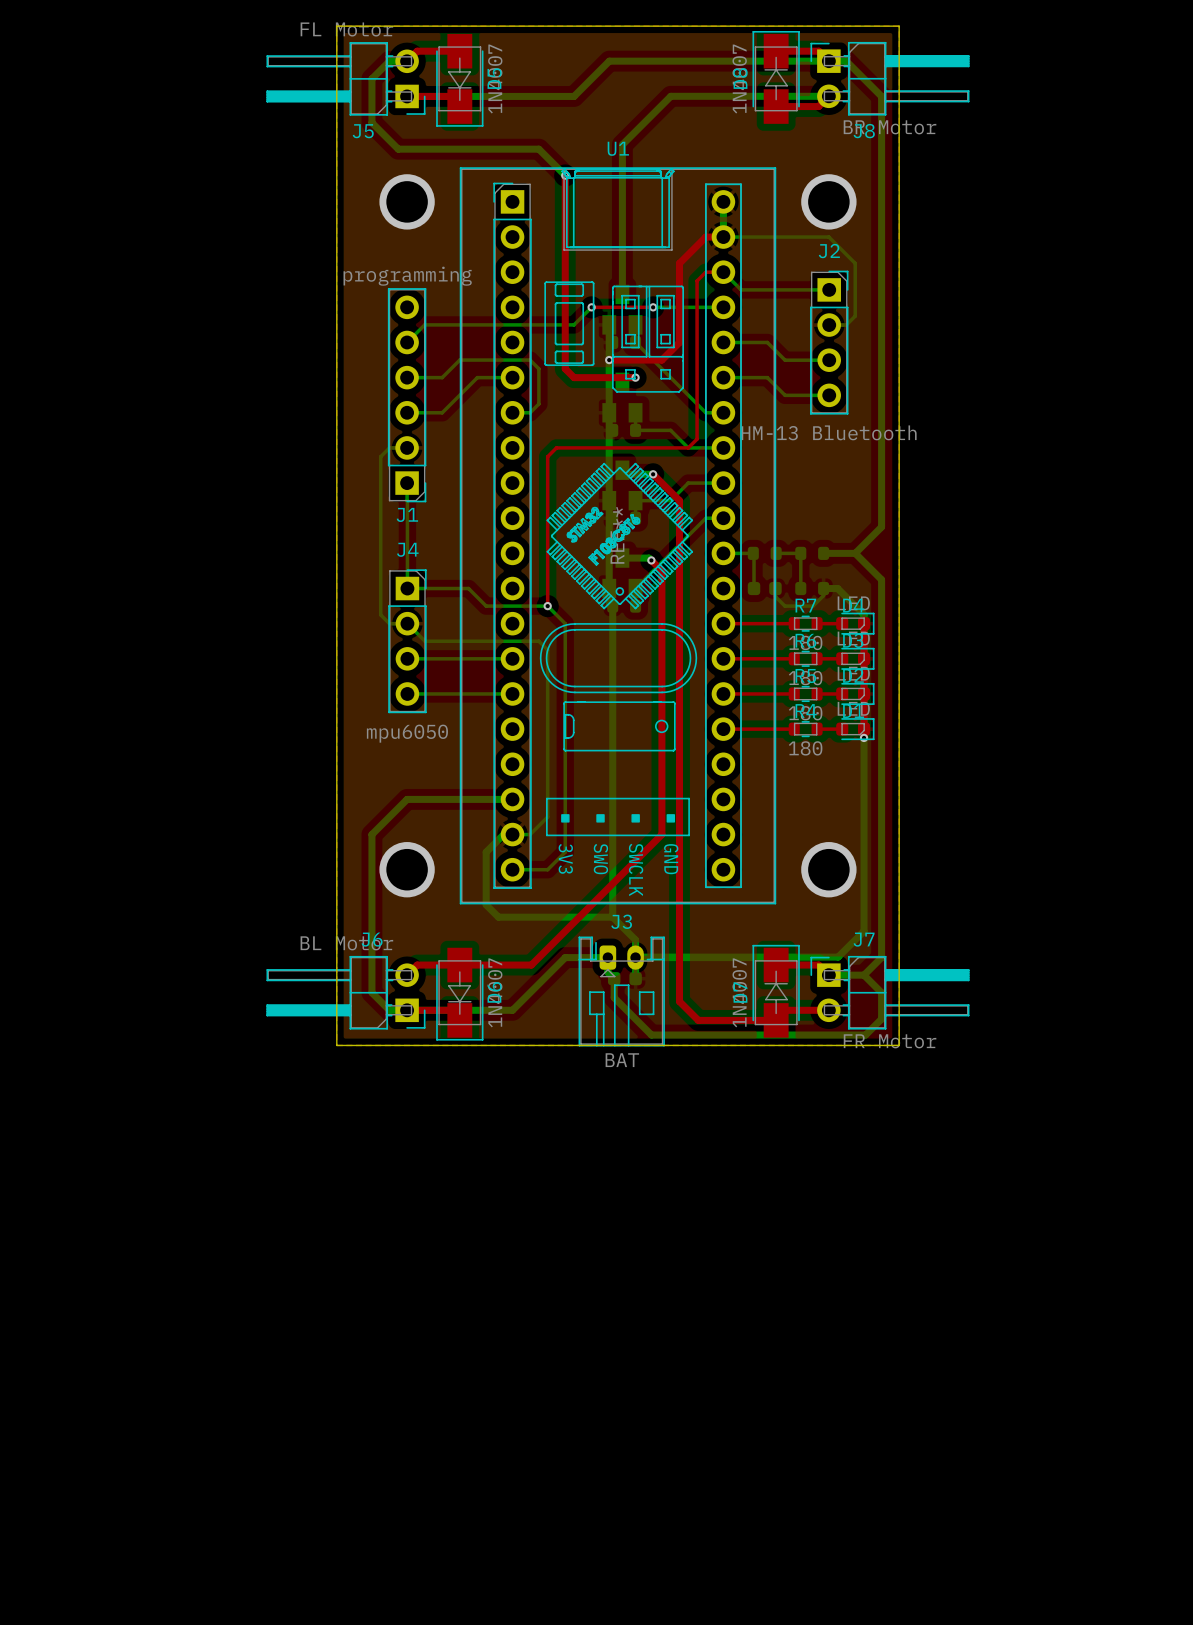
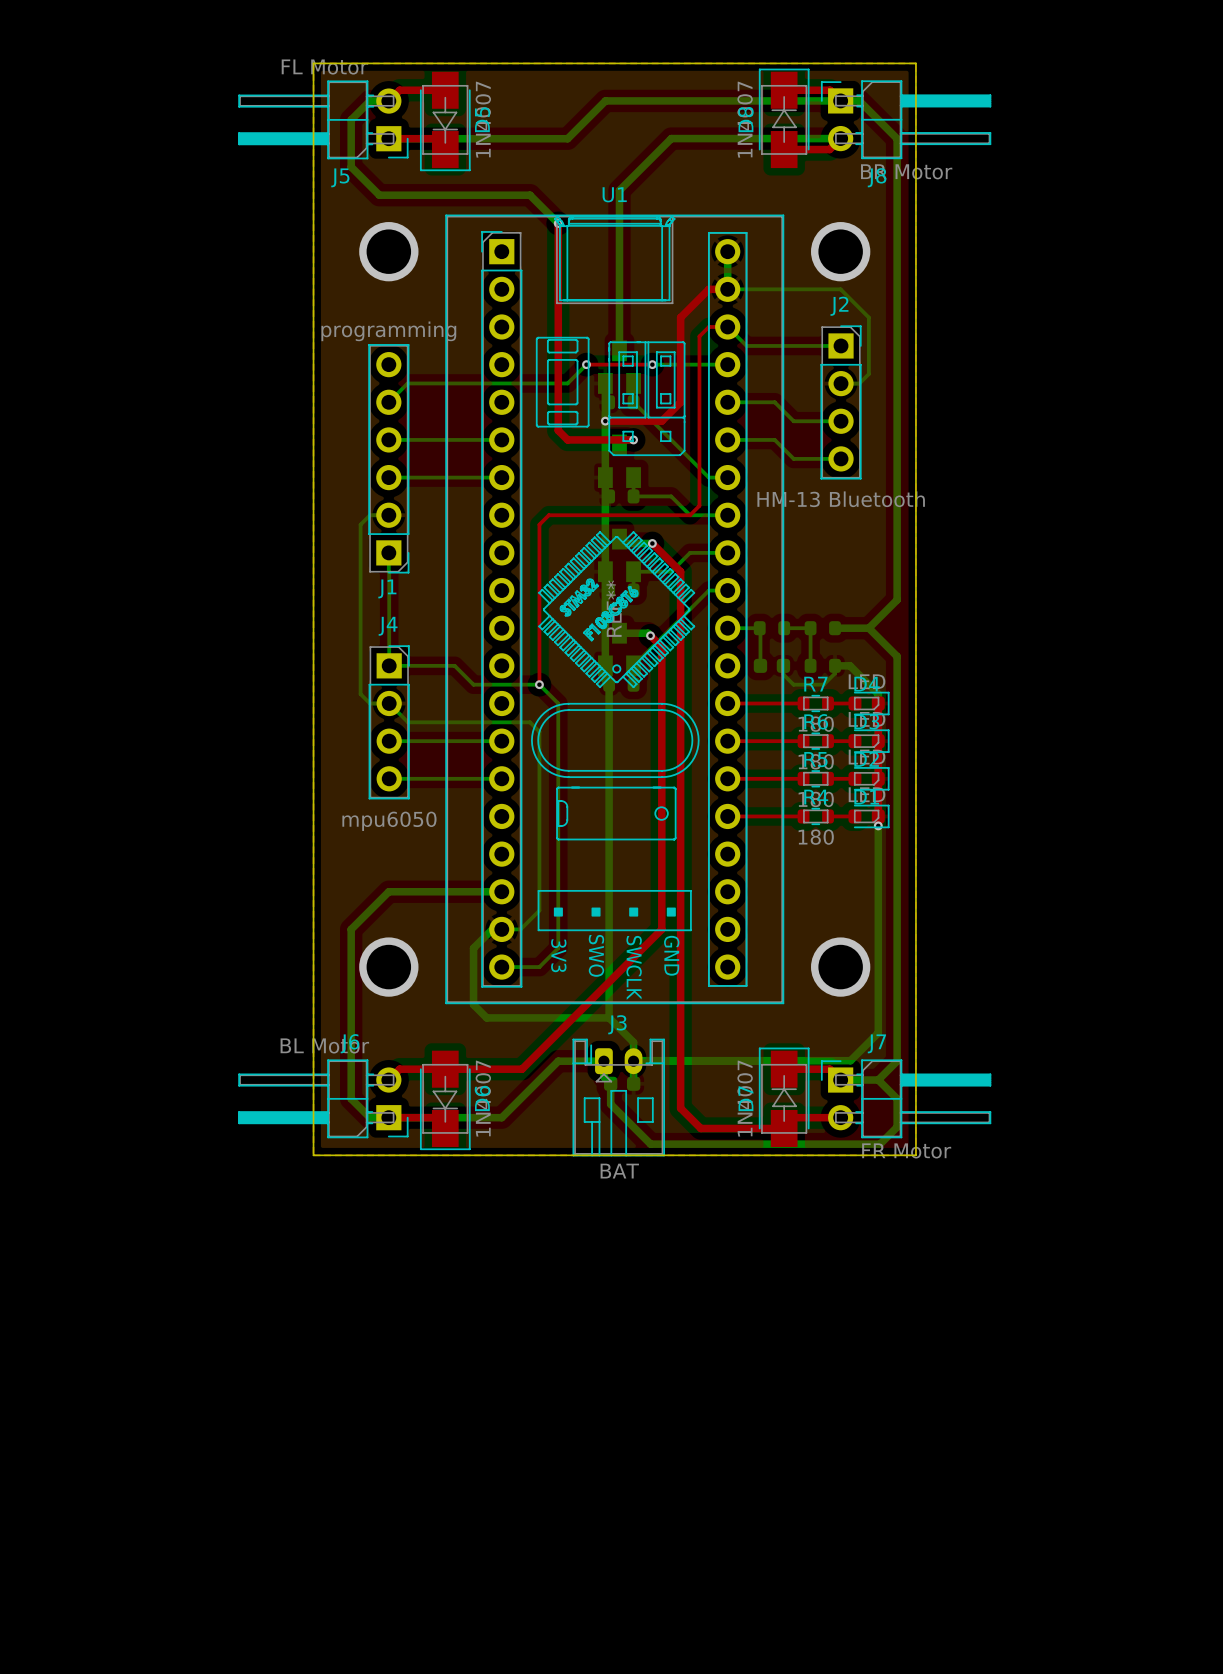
bottom track: (442, 377) (459, 360) (530, 360) (538, 368) (538, 403) (530, 412) (512, 412) -> (426, 477) (501, 477)
bottom track: (477, 377) (442, 412) -> (464, 439) (426, 439)

